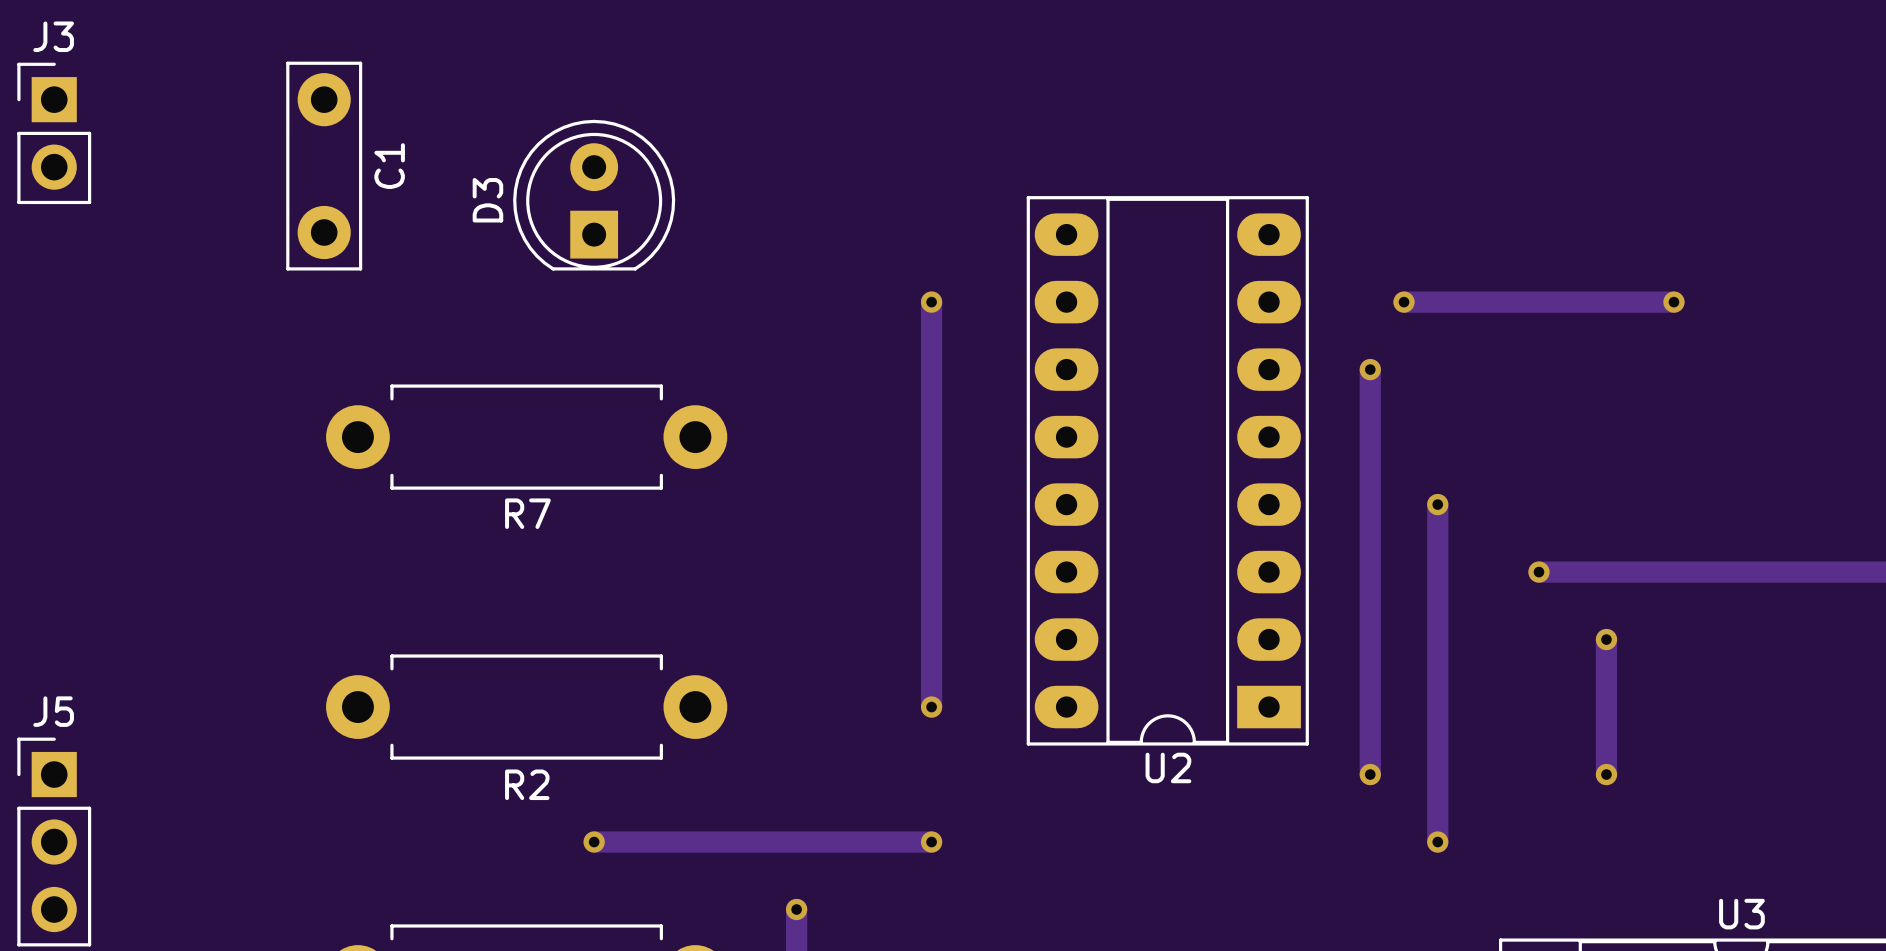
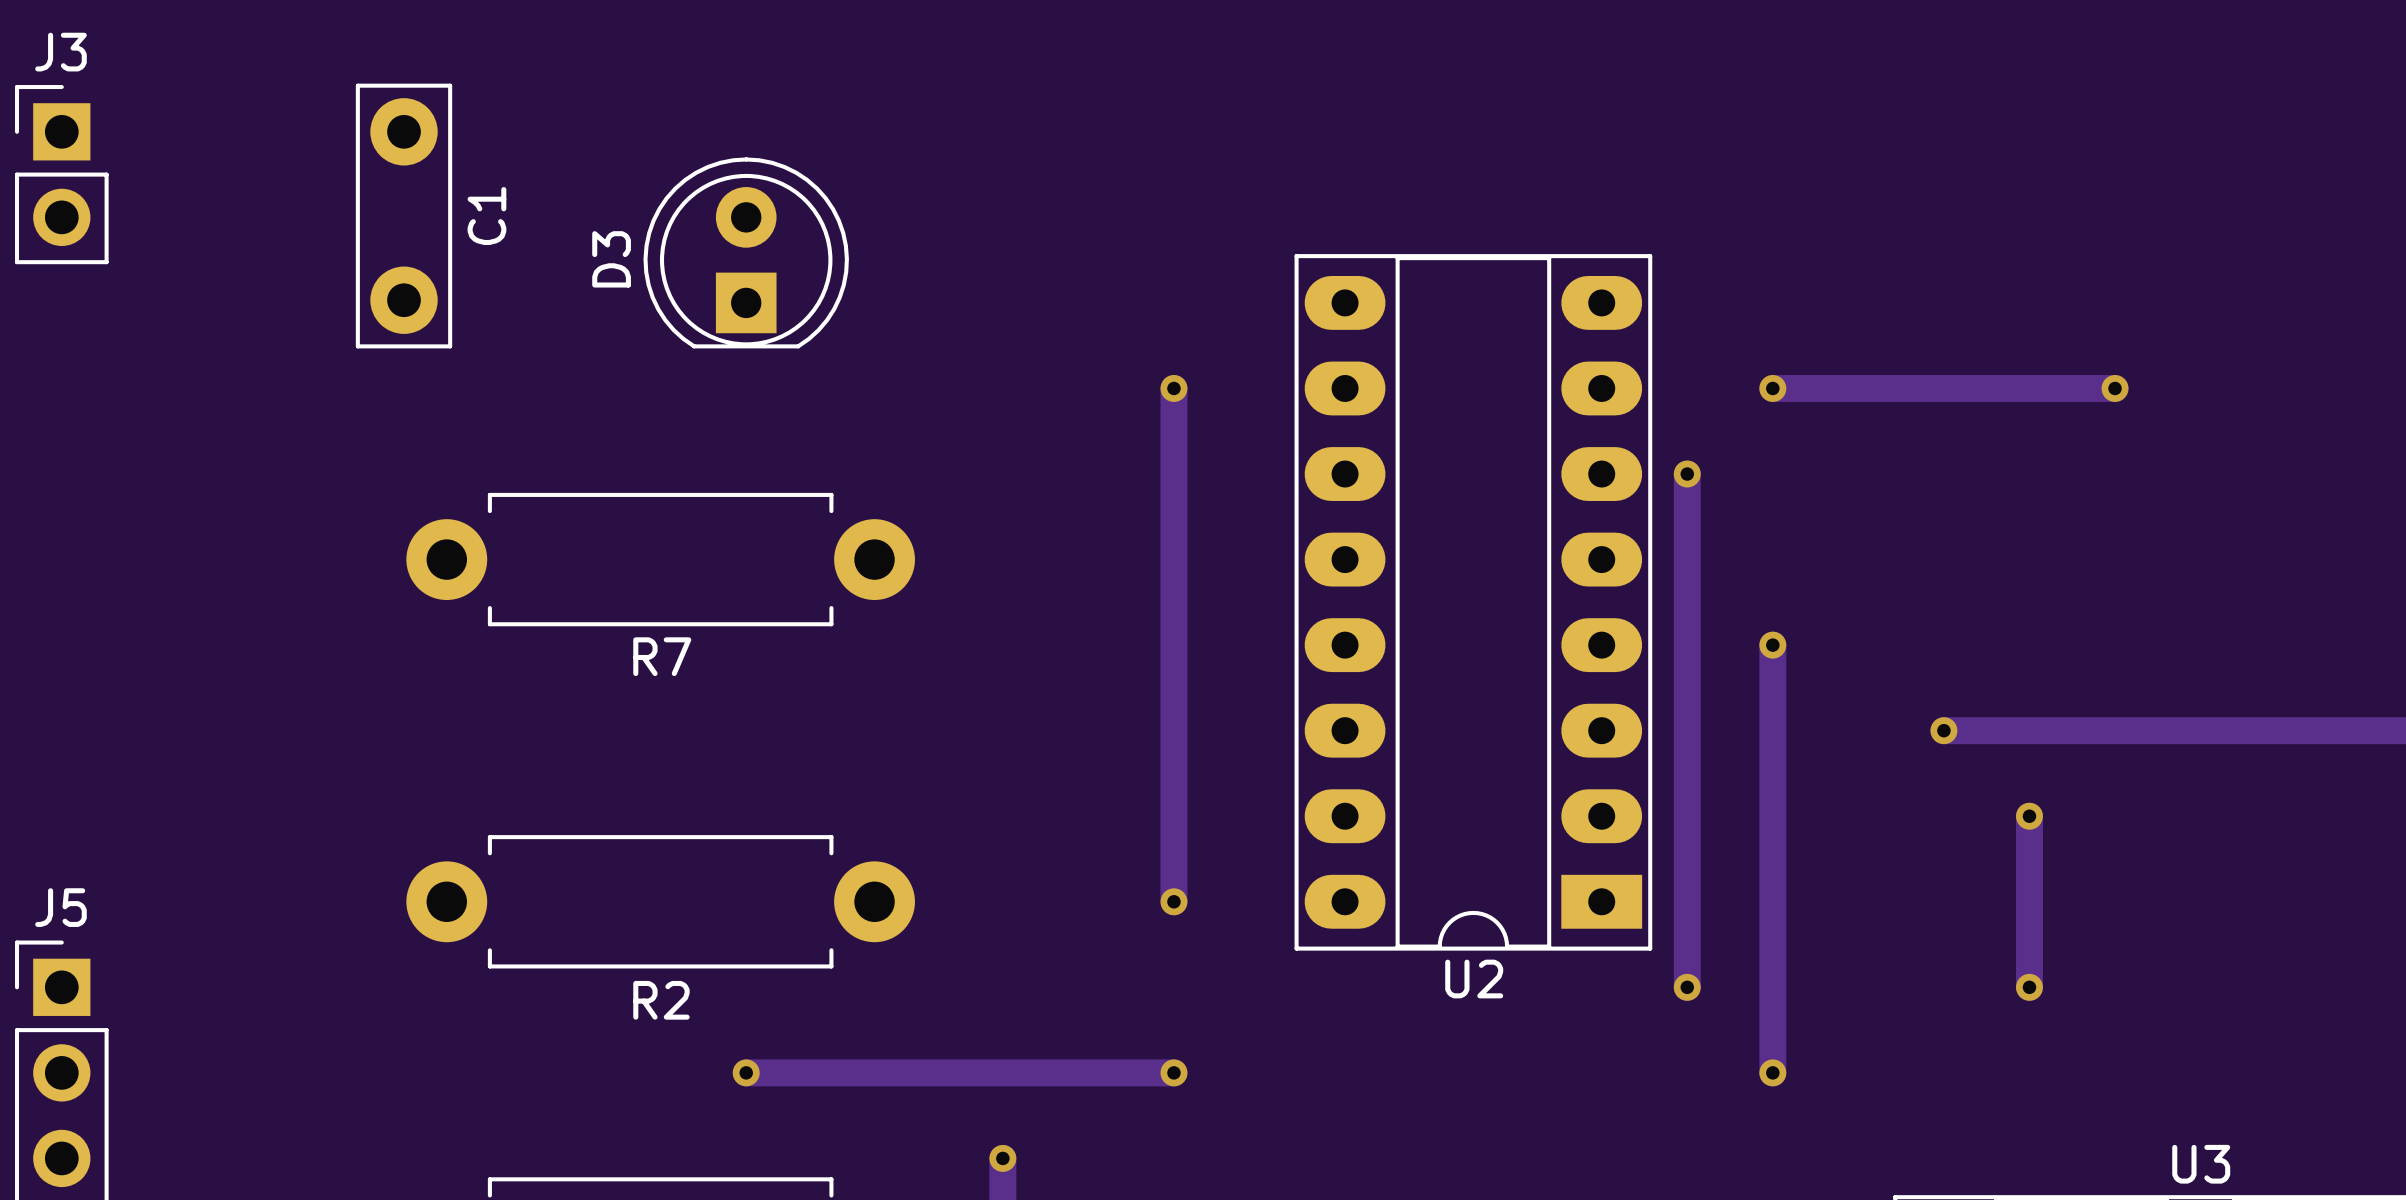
track: (1370, 369) (1370, 774) -> (1687, 474) (1687, 987)
via position: (1370, 369) -> (1687, 474)
track: (1437, 504) (1437, 842) -> (1772, 645) (1772, 1072)
via position: (1437, 504) -> (1772, 645)
via position: (1370, 774) -> (1687, 987)
via position: (1437, 842) -> (1772, 1072)

